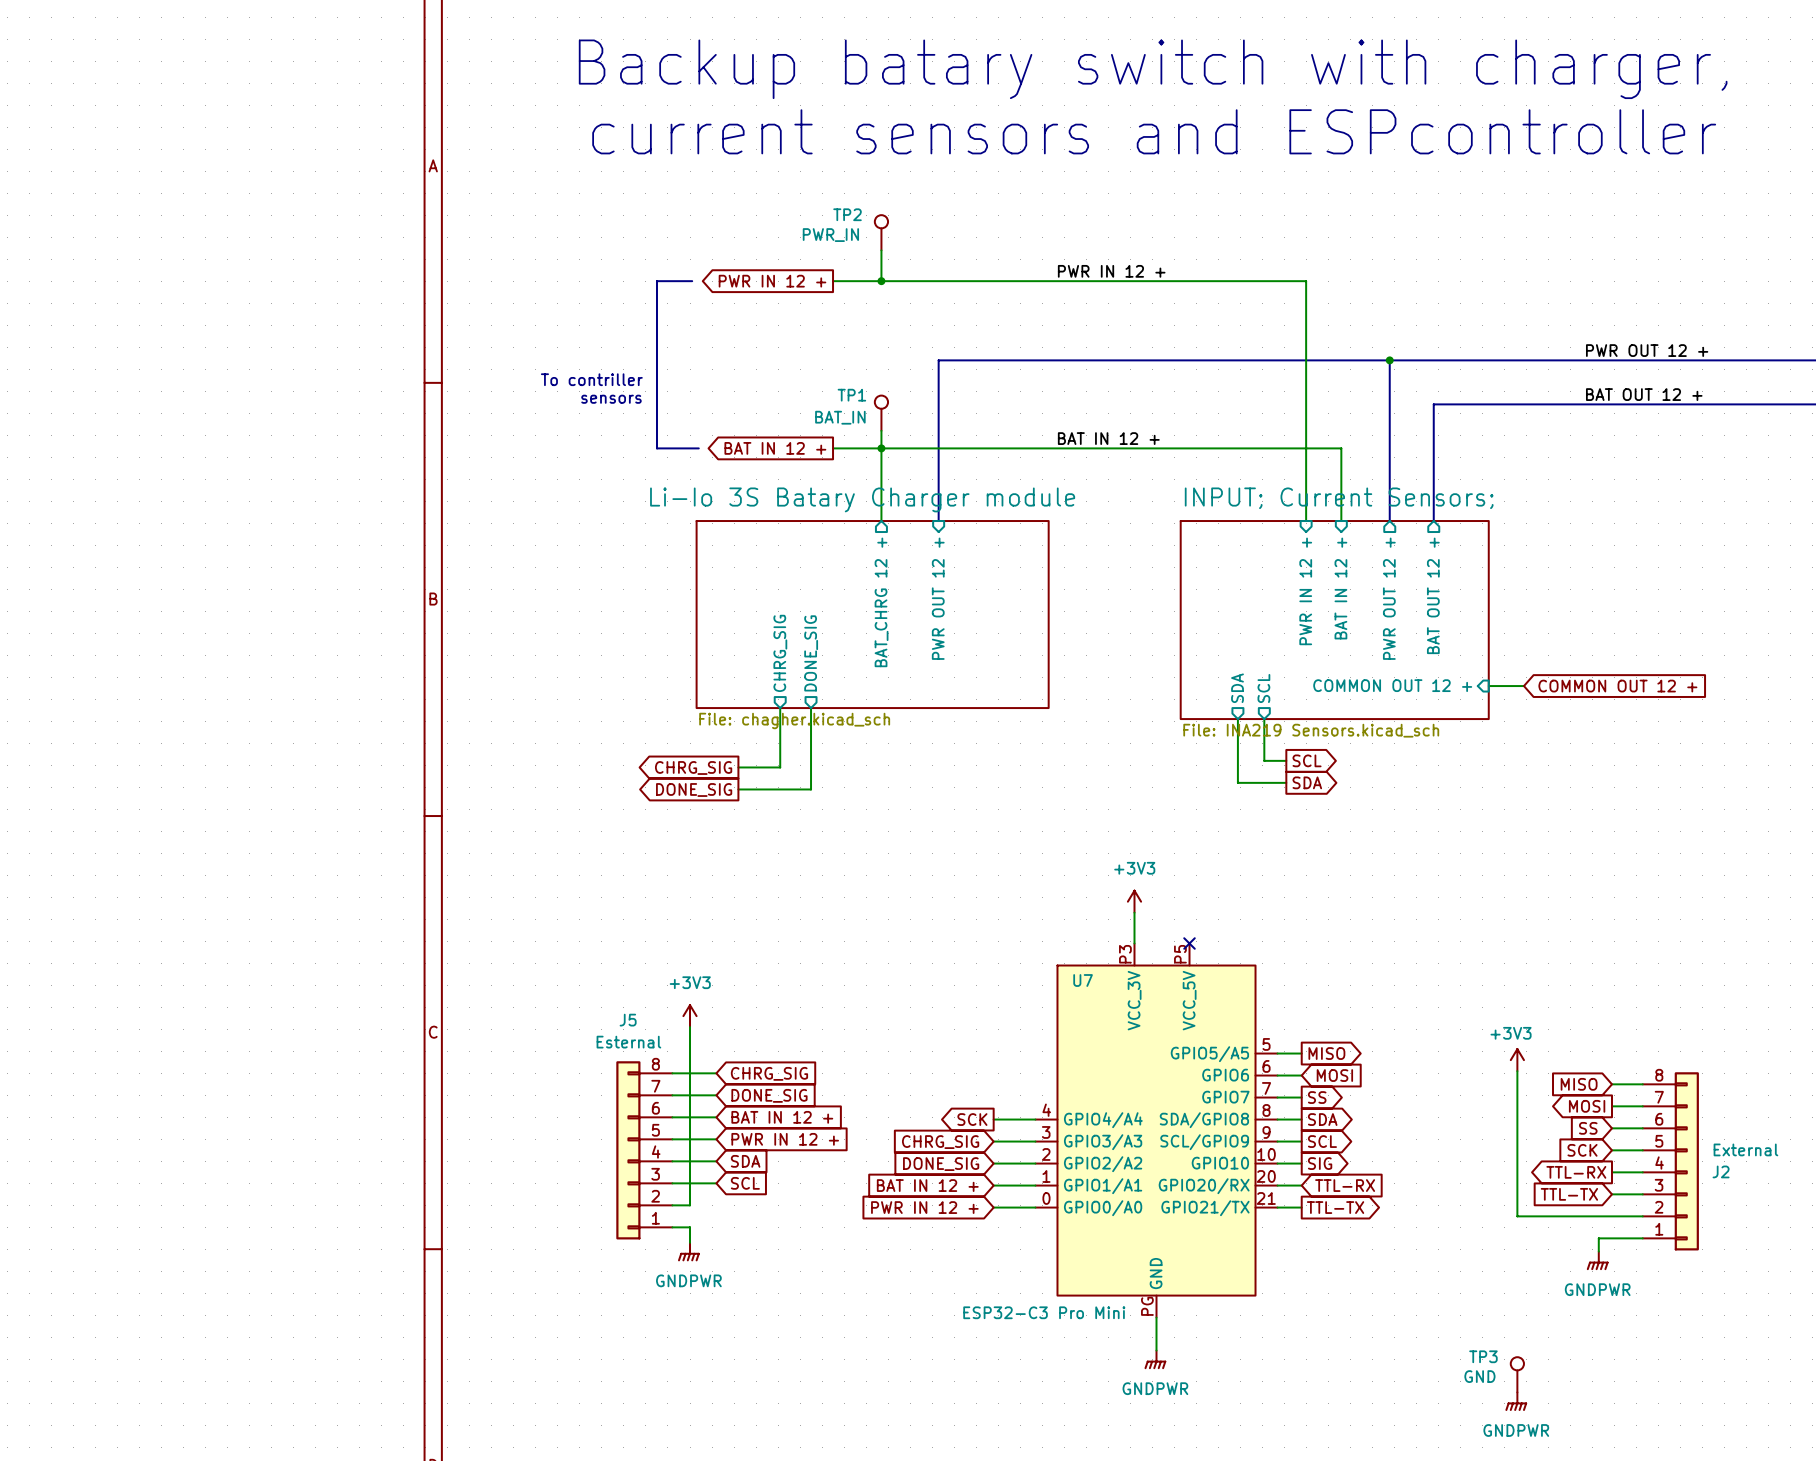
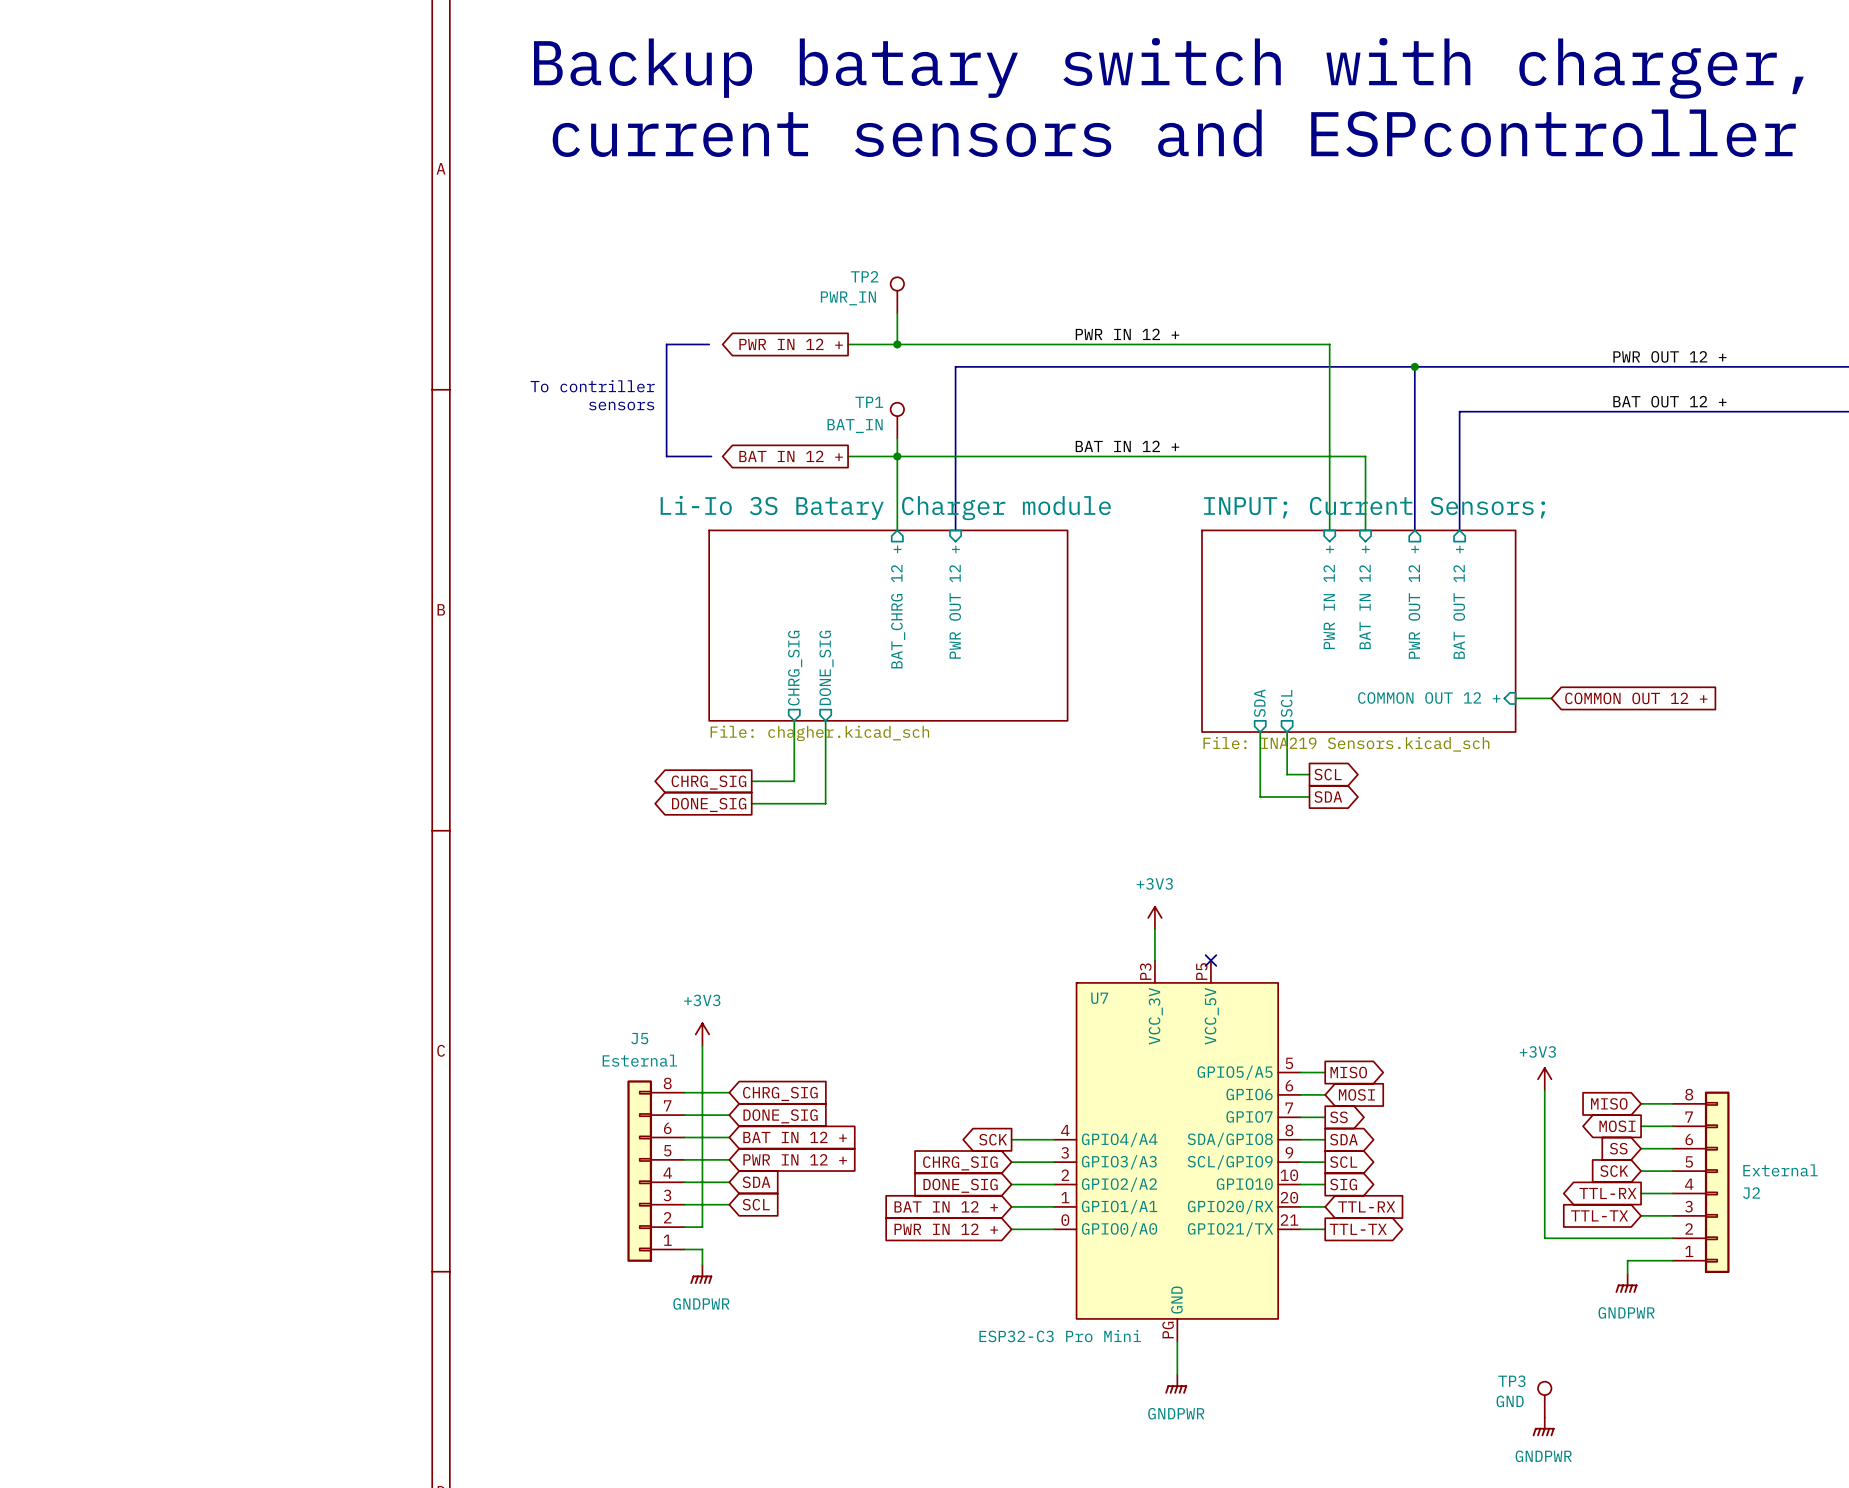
TP2 position: (881, 232) -> (897, 295)
wire: (881, 250) (881, 281) -> (897, 313) (897, 344)
label position: PWR IN 12 + (1111, 271) -> PWR IN 12 + (1127, 334)
line: (692, 281) (656, 281) (656, 448) -> (709, 344) (666, 344) (666, 456) (668, 456)
global label position: PWR IN 12 + (772, 281) -> PWR IN 12 + (791, 344)
wire: (833, 281) (1306, 281) (1306, 338) -> (848, 344) (1329, 344)
junction: (881, 281) -> none
junction: none -> (897, 344)

